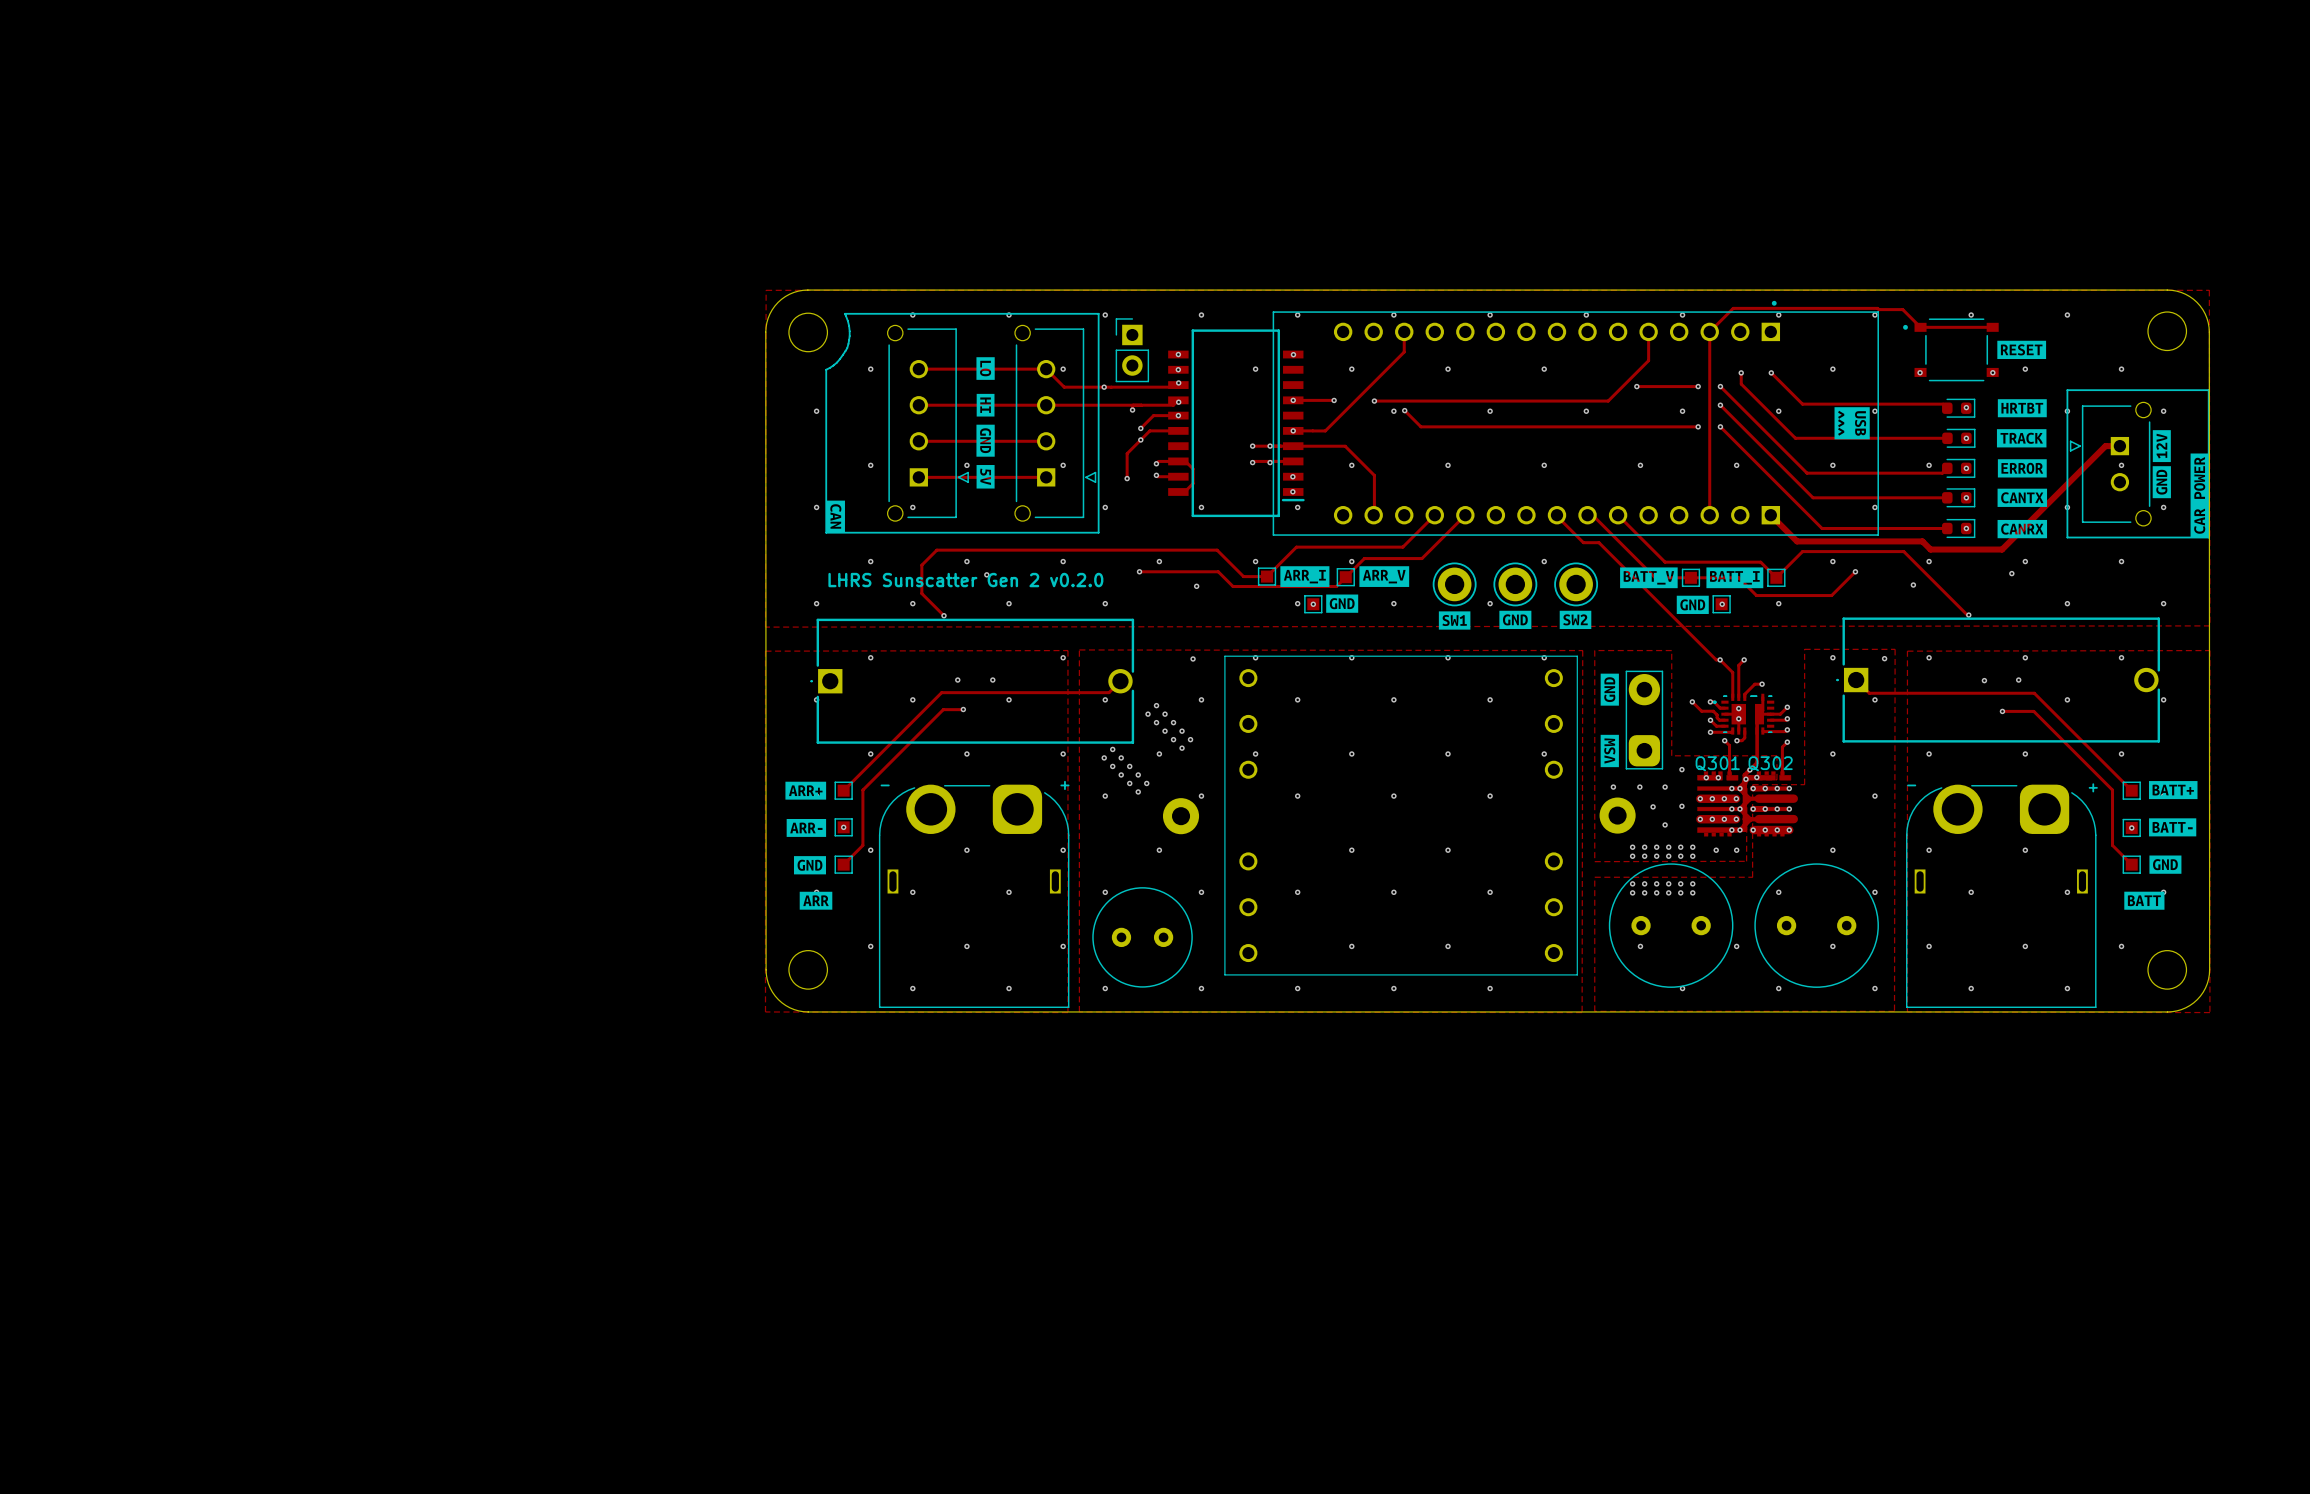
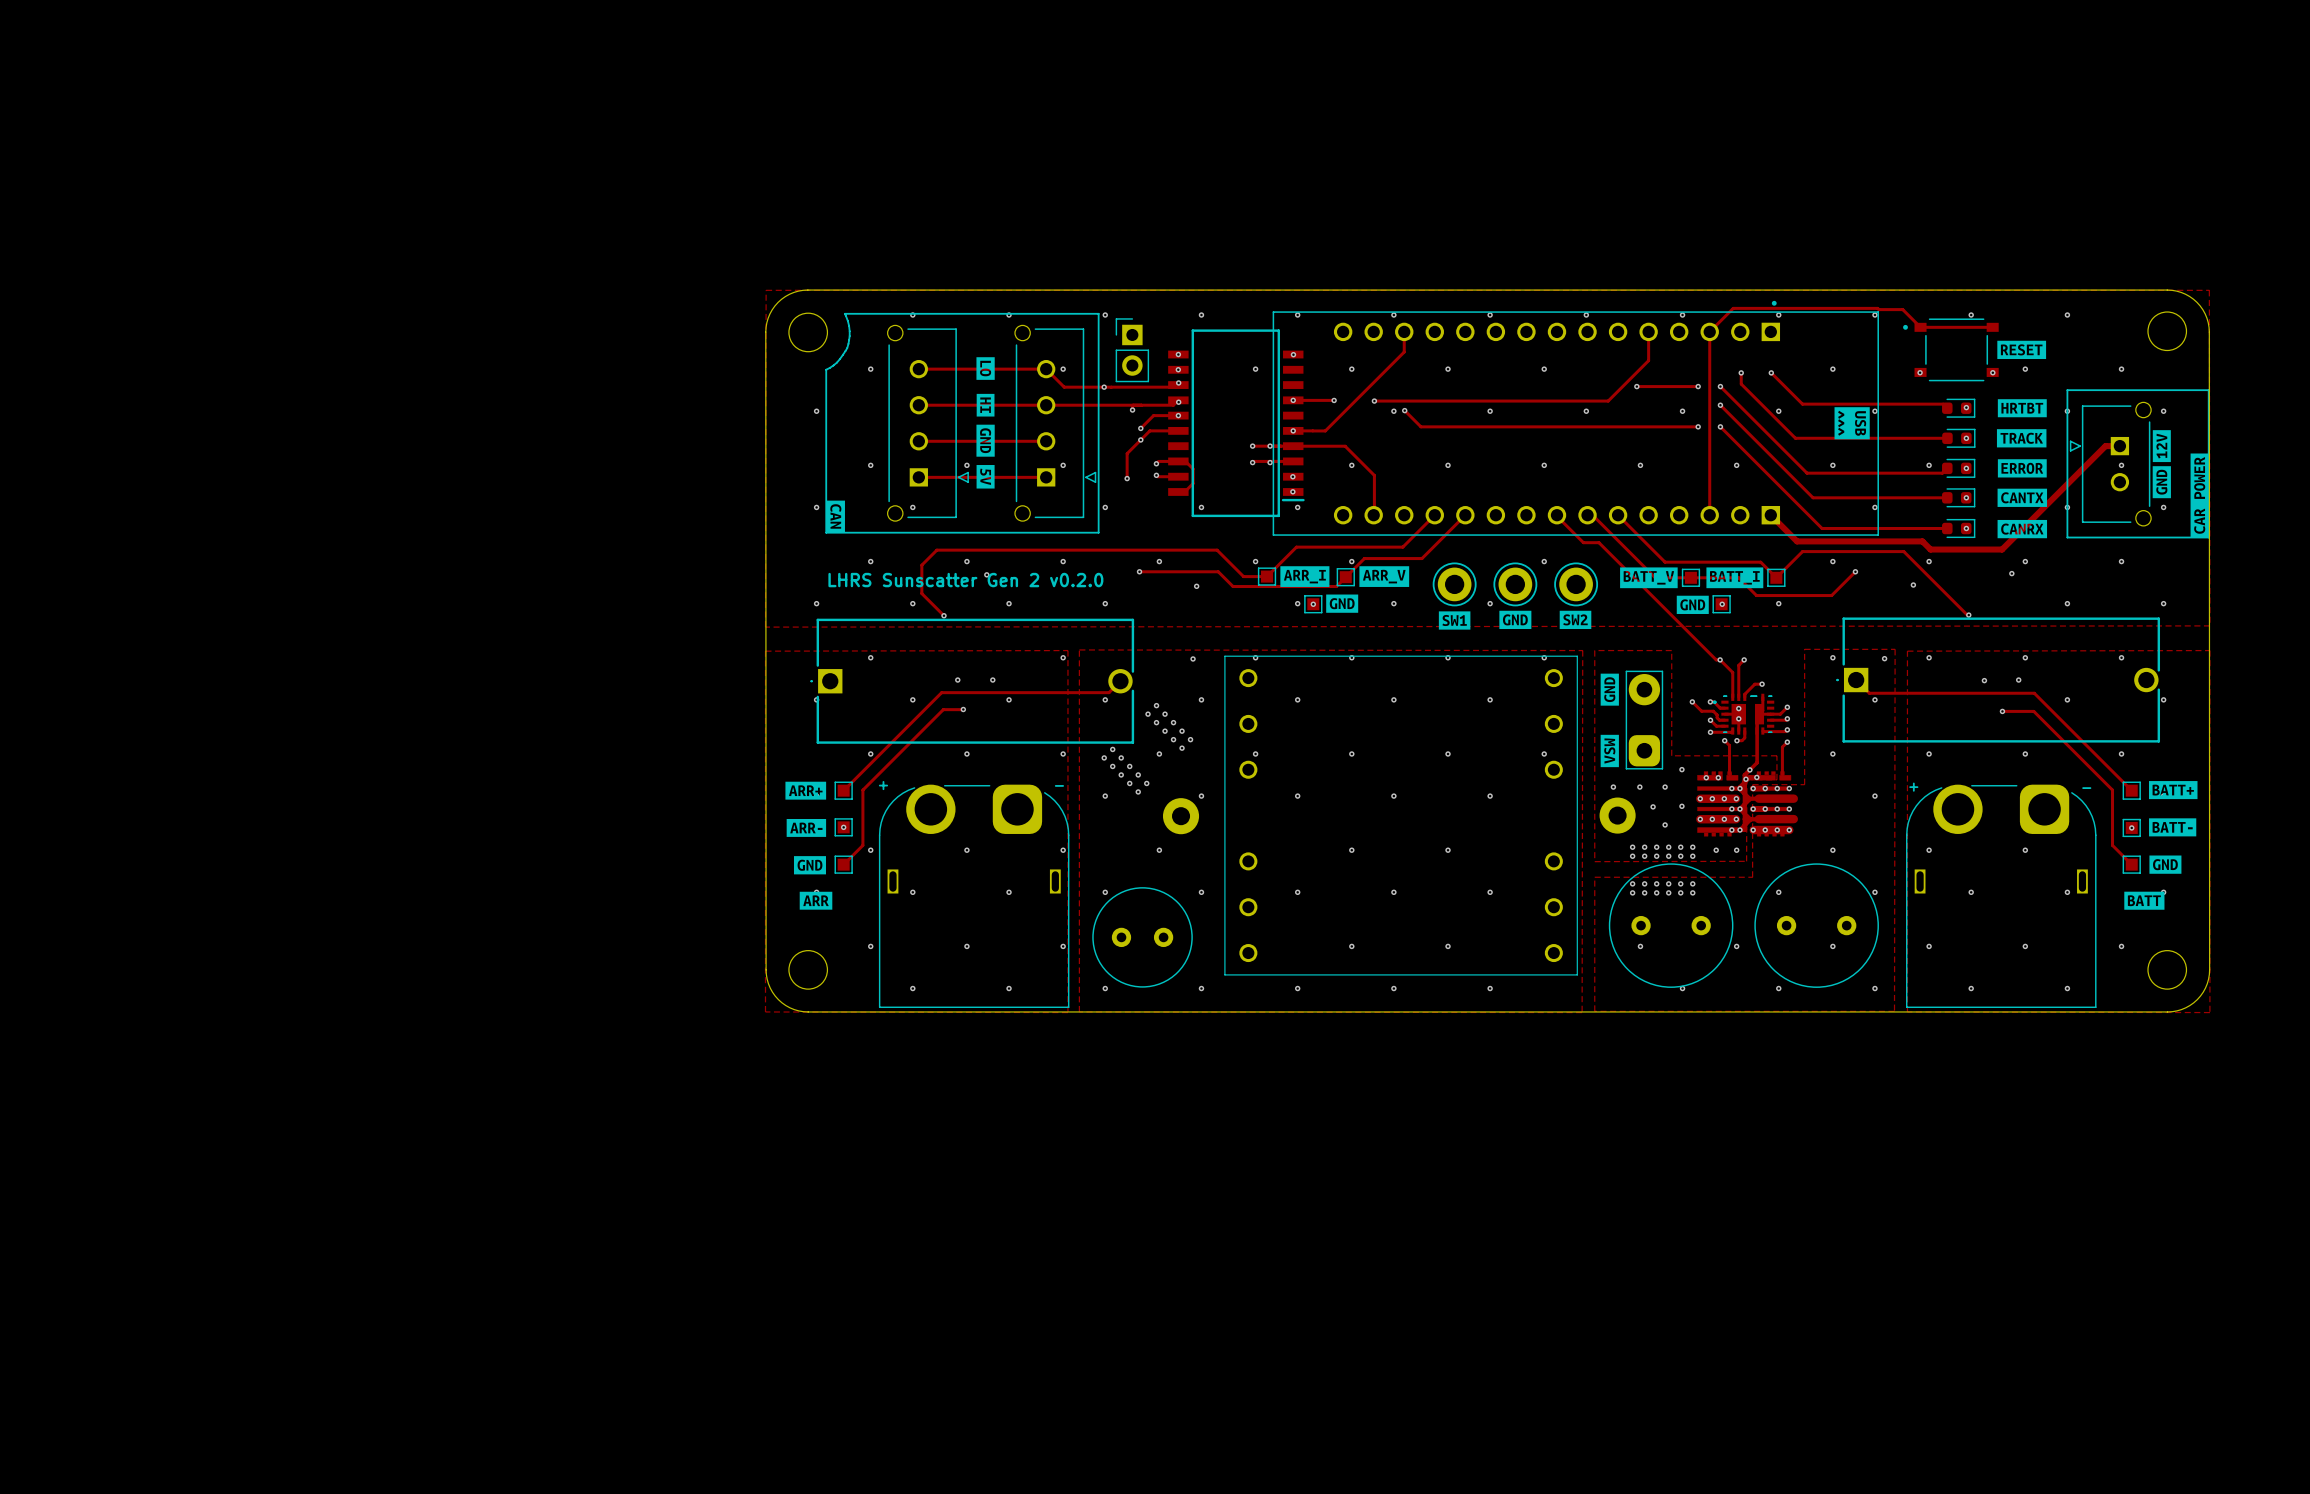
Q301 name: Q301 (1717, 763) -> none
Q302 name: Q302 (1770, 763) -> none
part text position: - (885, 785) -> - (1059, 785)
part text position: + (1064, 785) -> + (883, 785)
part text position: - (1911, 785) -> - (2086, 788)
part text position: + (2093, 787) -> + (1913, 787)

